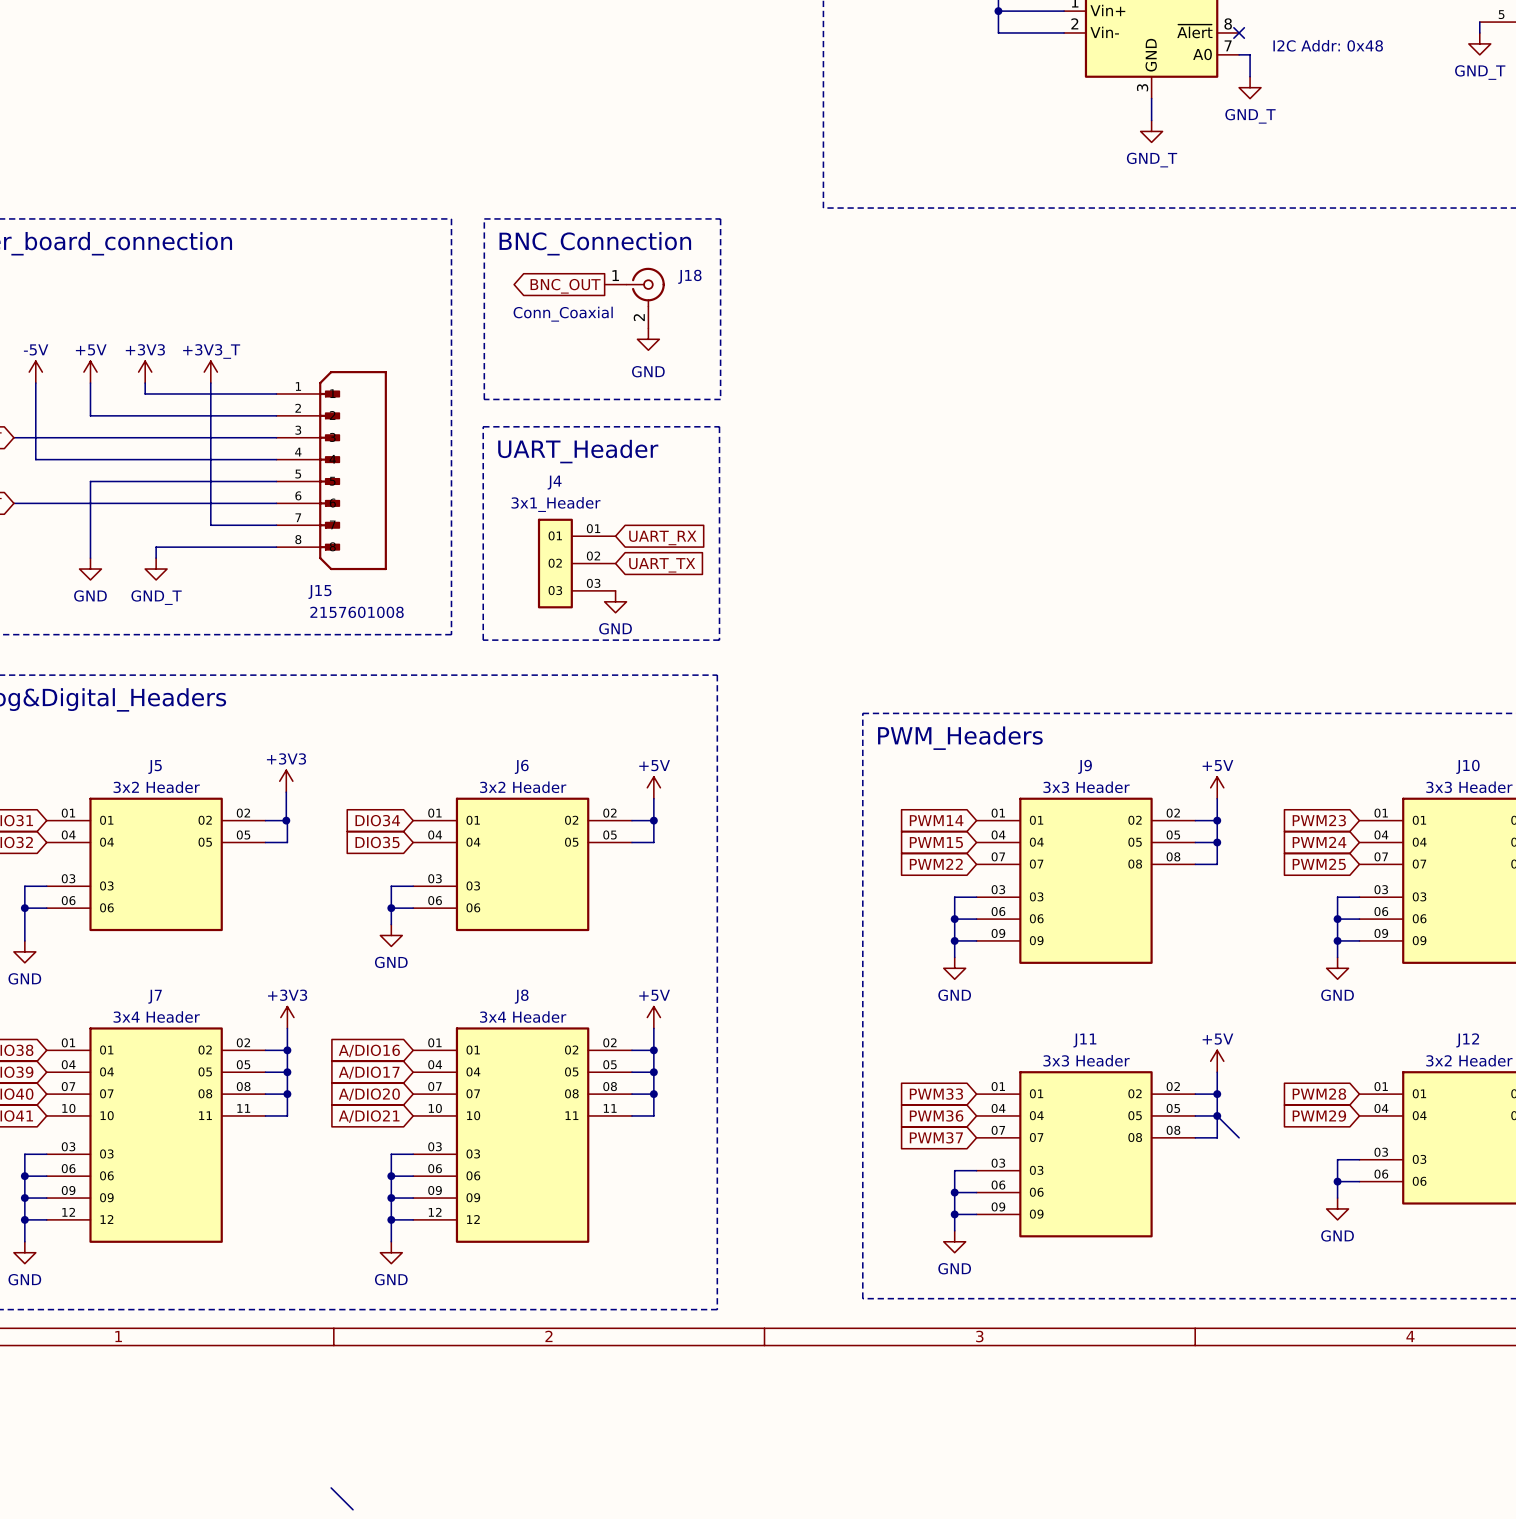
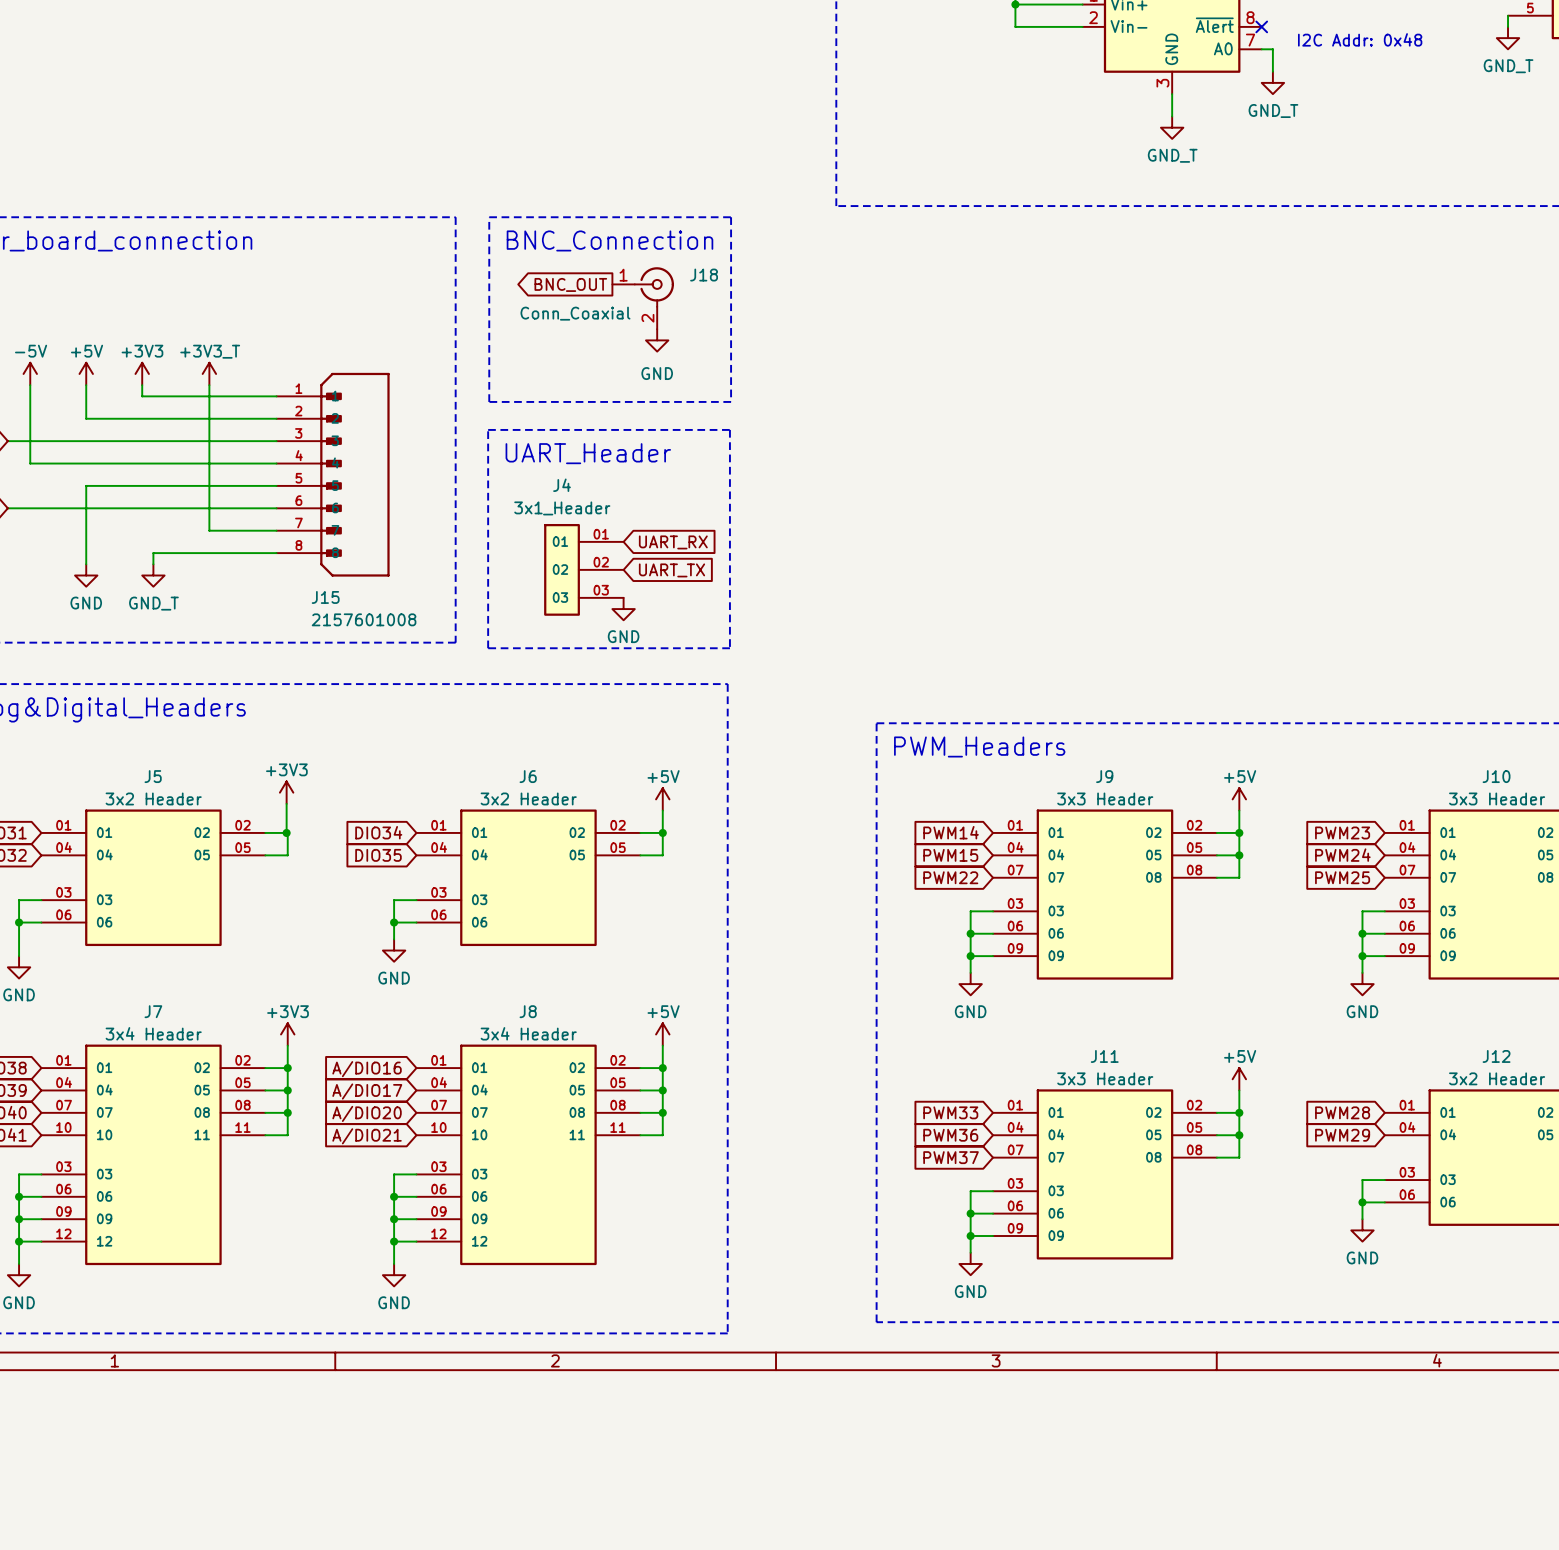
wire: (1217, 1115) (1239, 1137) -> none
wire: (331, 1487) (353, 1509) -> none

